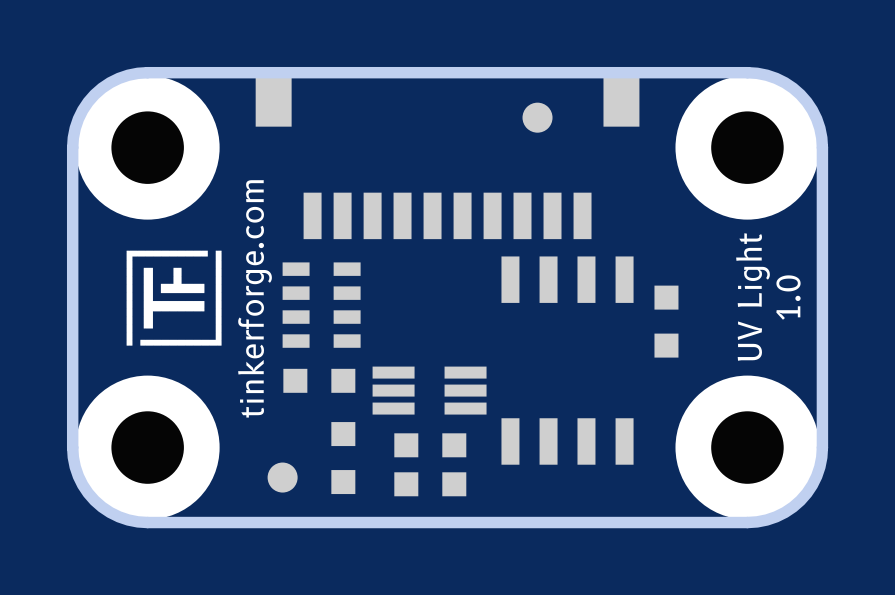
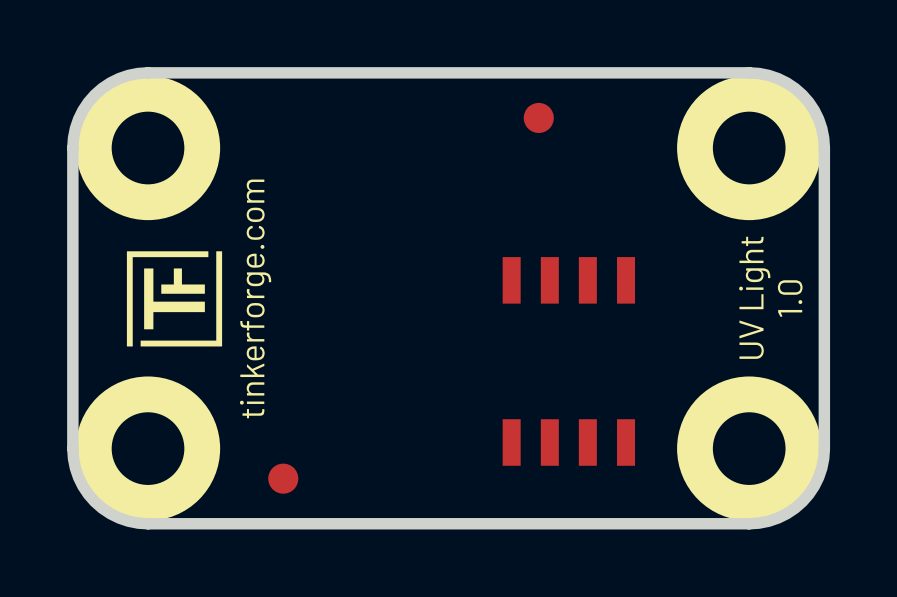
part: (447, 155) -> none
part: (321, 305) -> none
part: (666, 321) -> none
part: (319, 380) -> none
part: (429, 390) -> none
part: (430, 445) -> none
part: (343, 458) -> none
part: (430, 484) -> none

